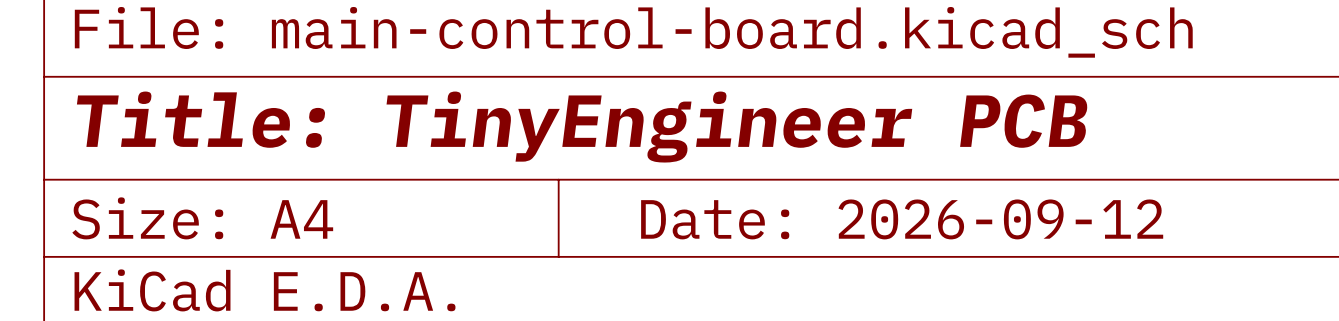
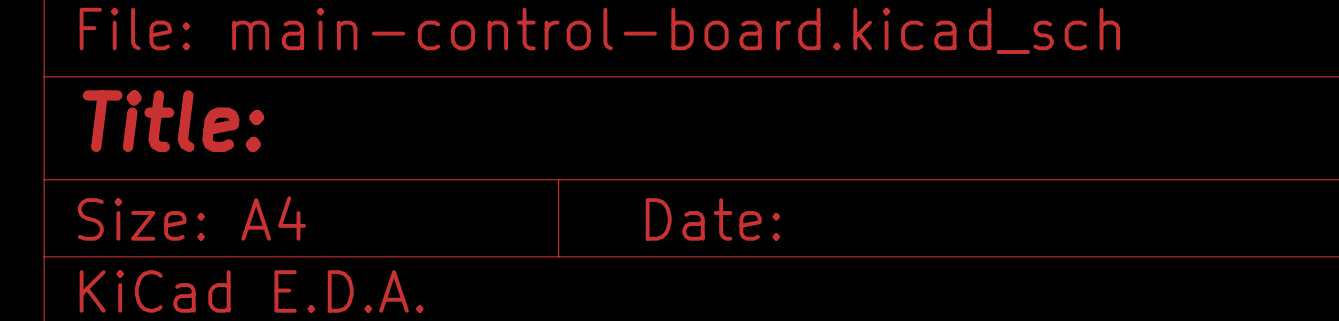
title block: Title: TinyEngineer PCB (582, 127) -> Title: (173, 121)
title block: Date: 2026-09-12 (902, 219) -> Date: (712, 219)

